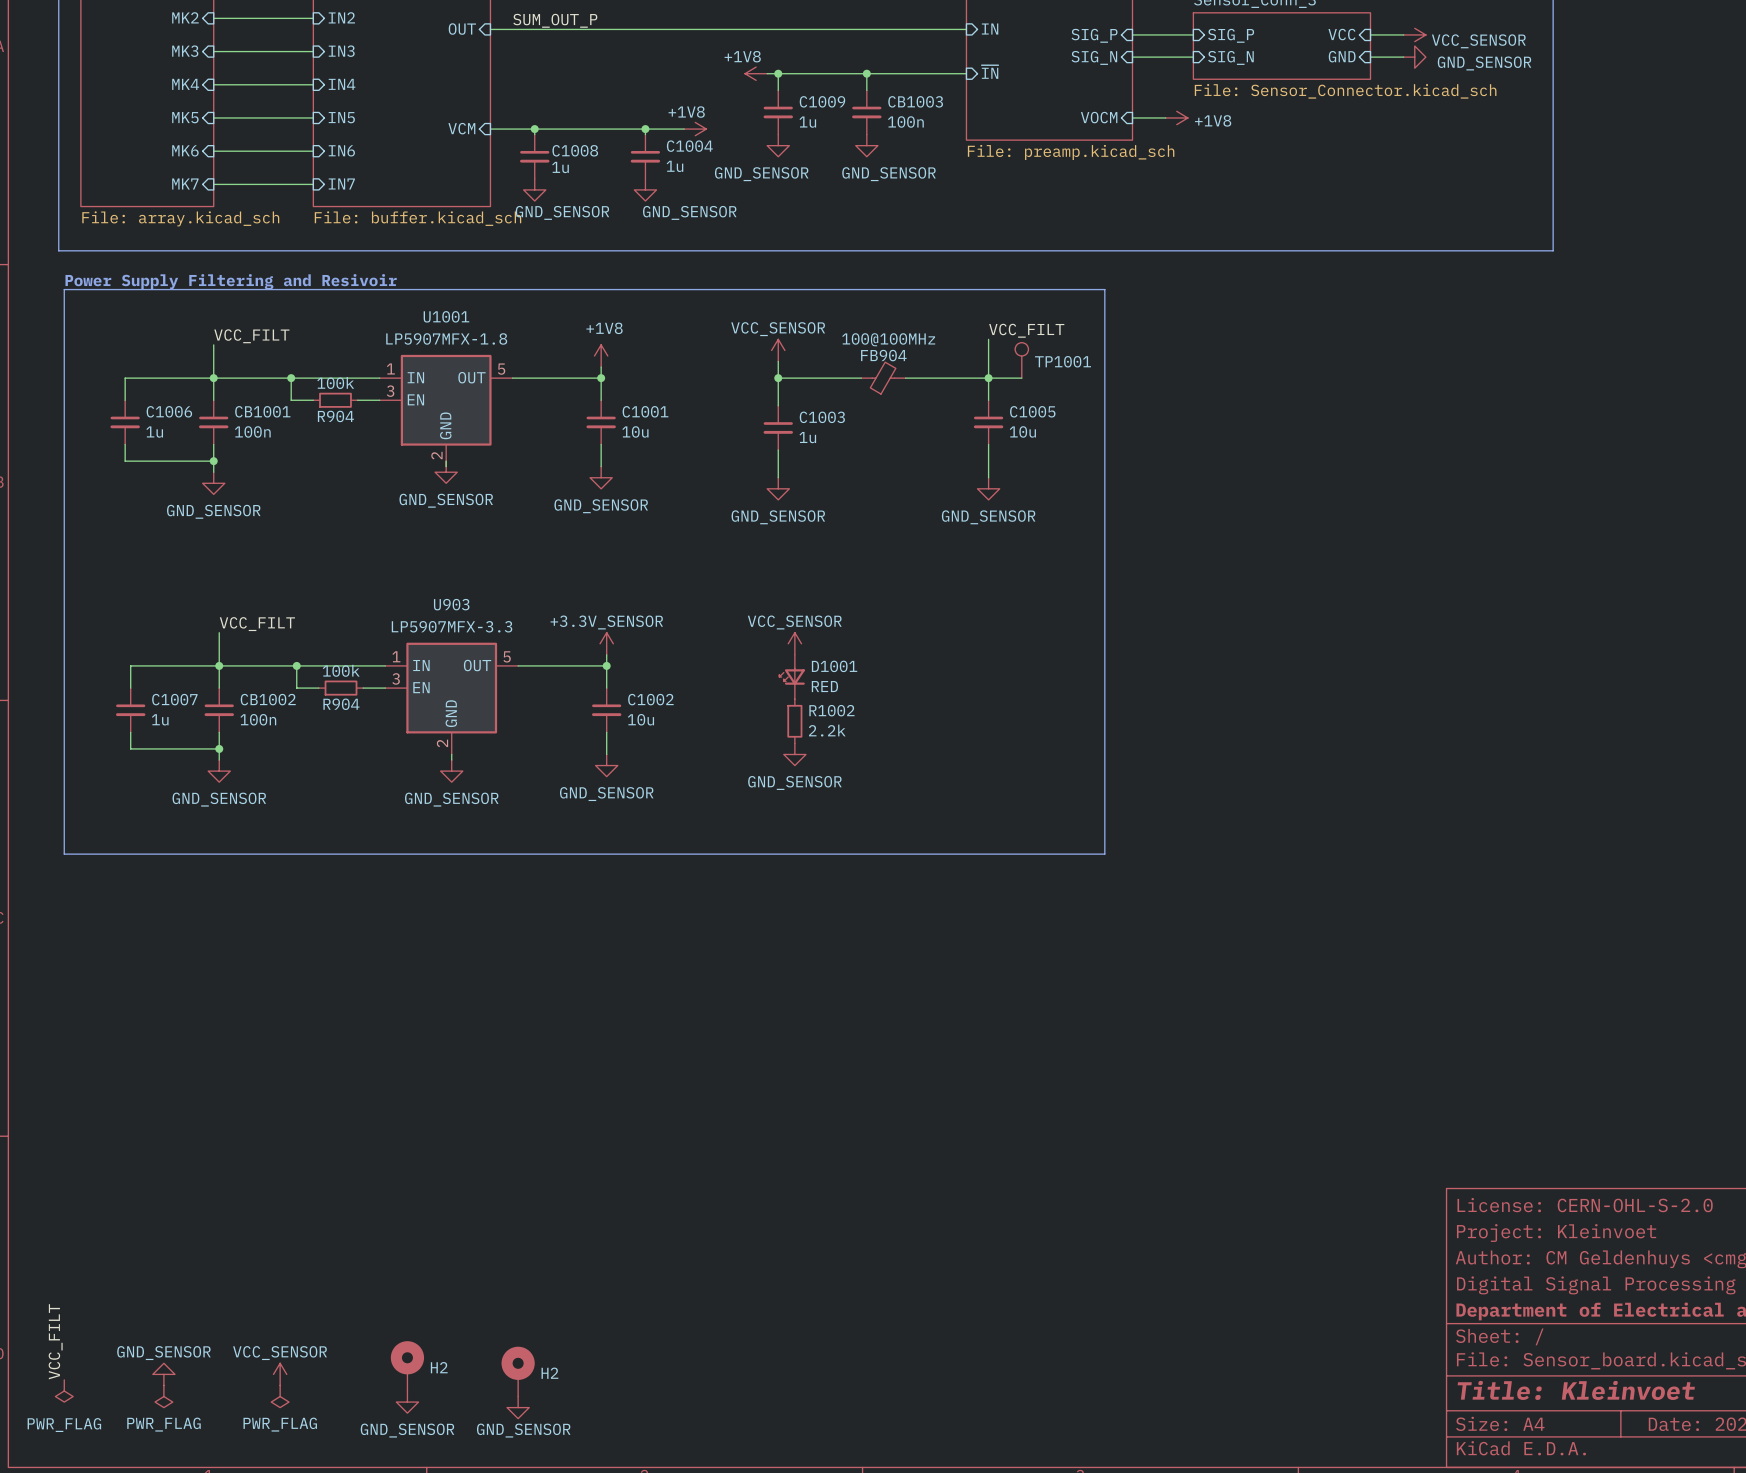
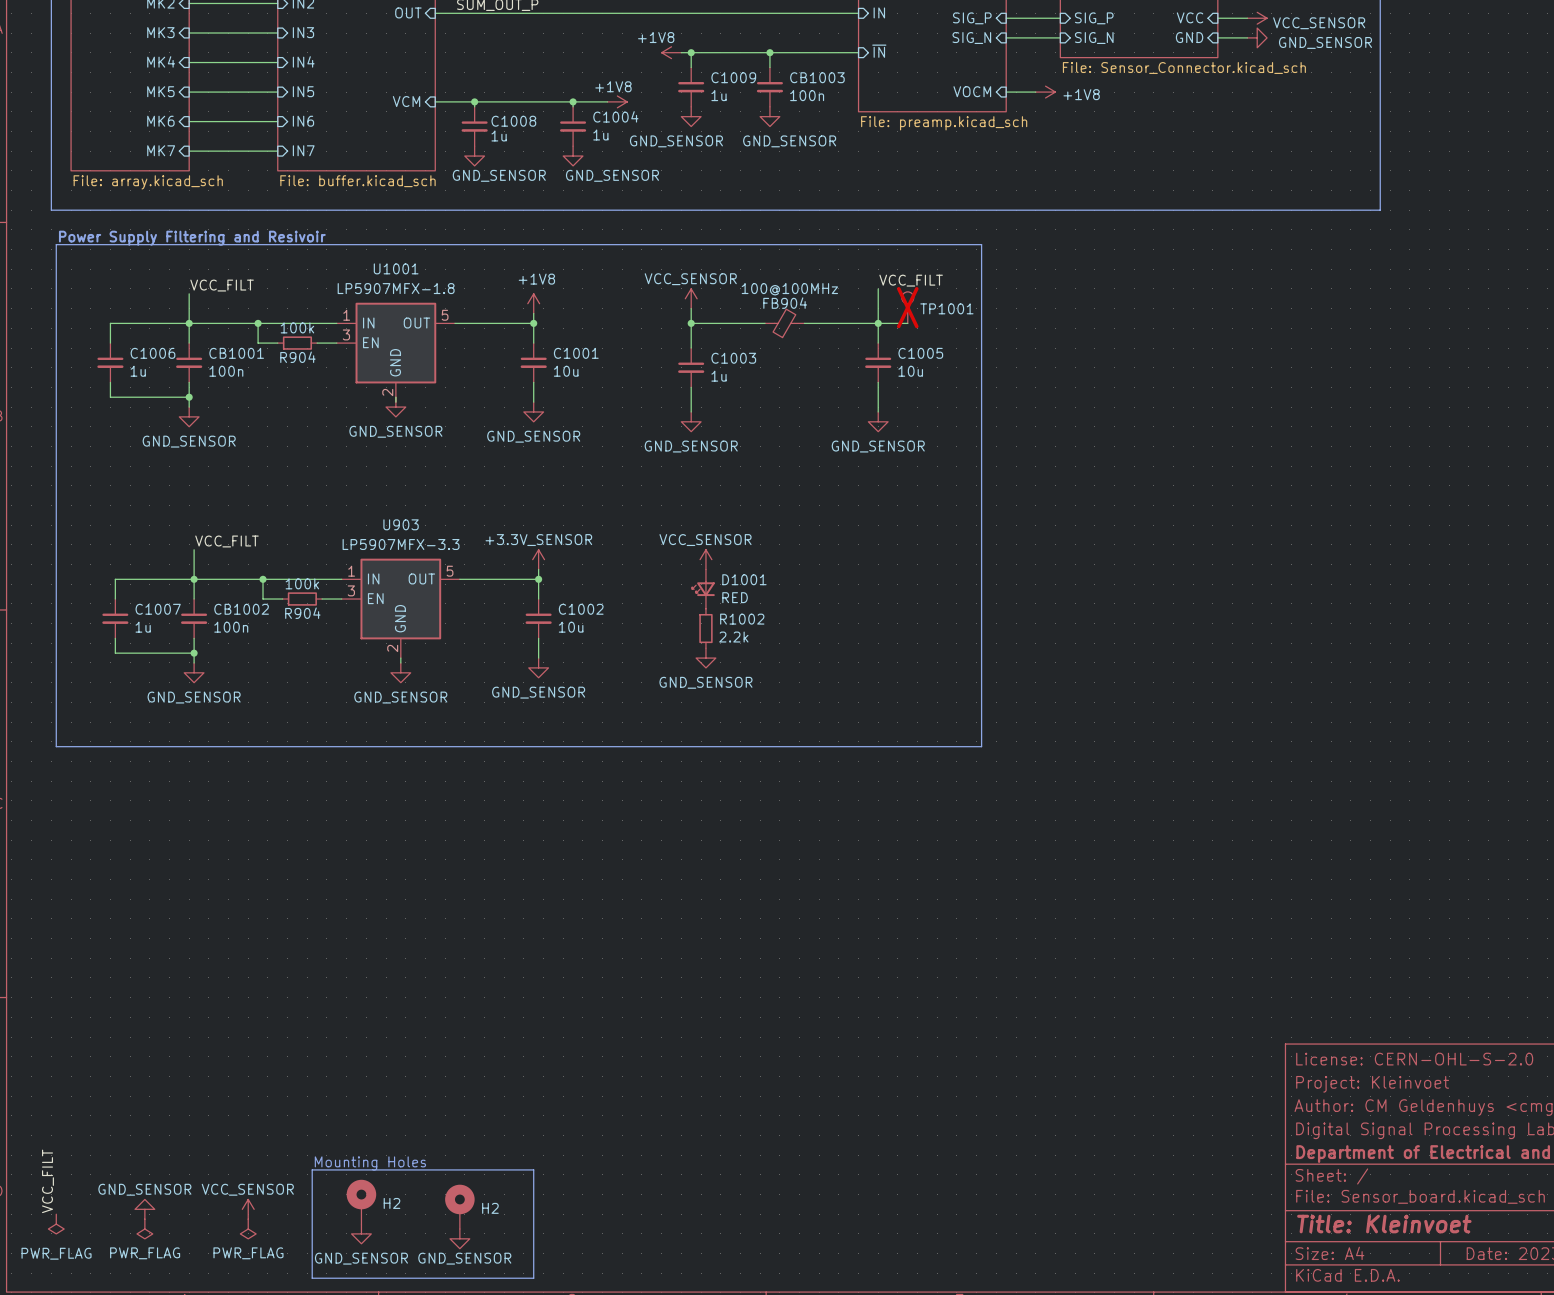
TP1001 do-not-place cross: none -> (907, 307)
text: none -> Mounting Holes (370, 1163)
line: none -> (312, 1169) (533, 1169) (533, 1278) (312, 1278) (312, 1169)

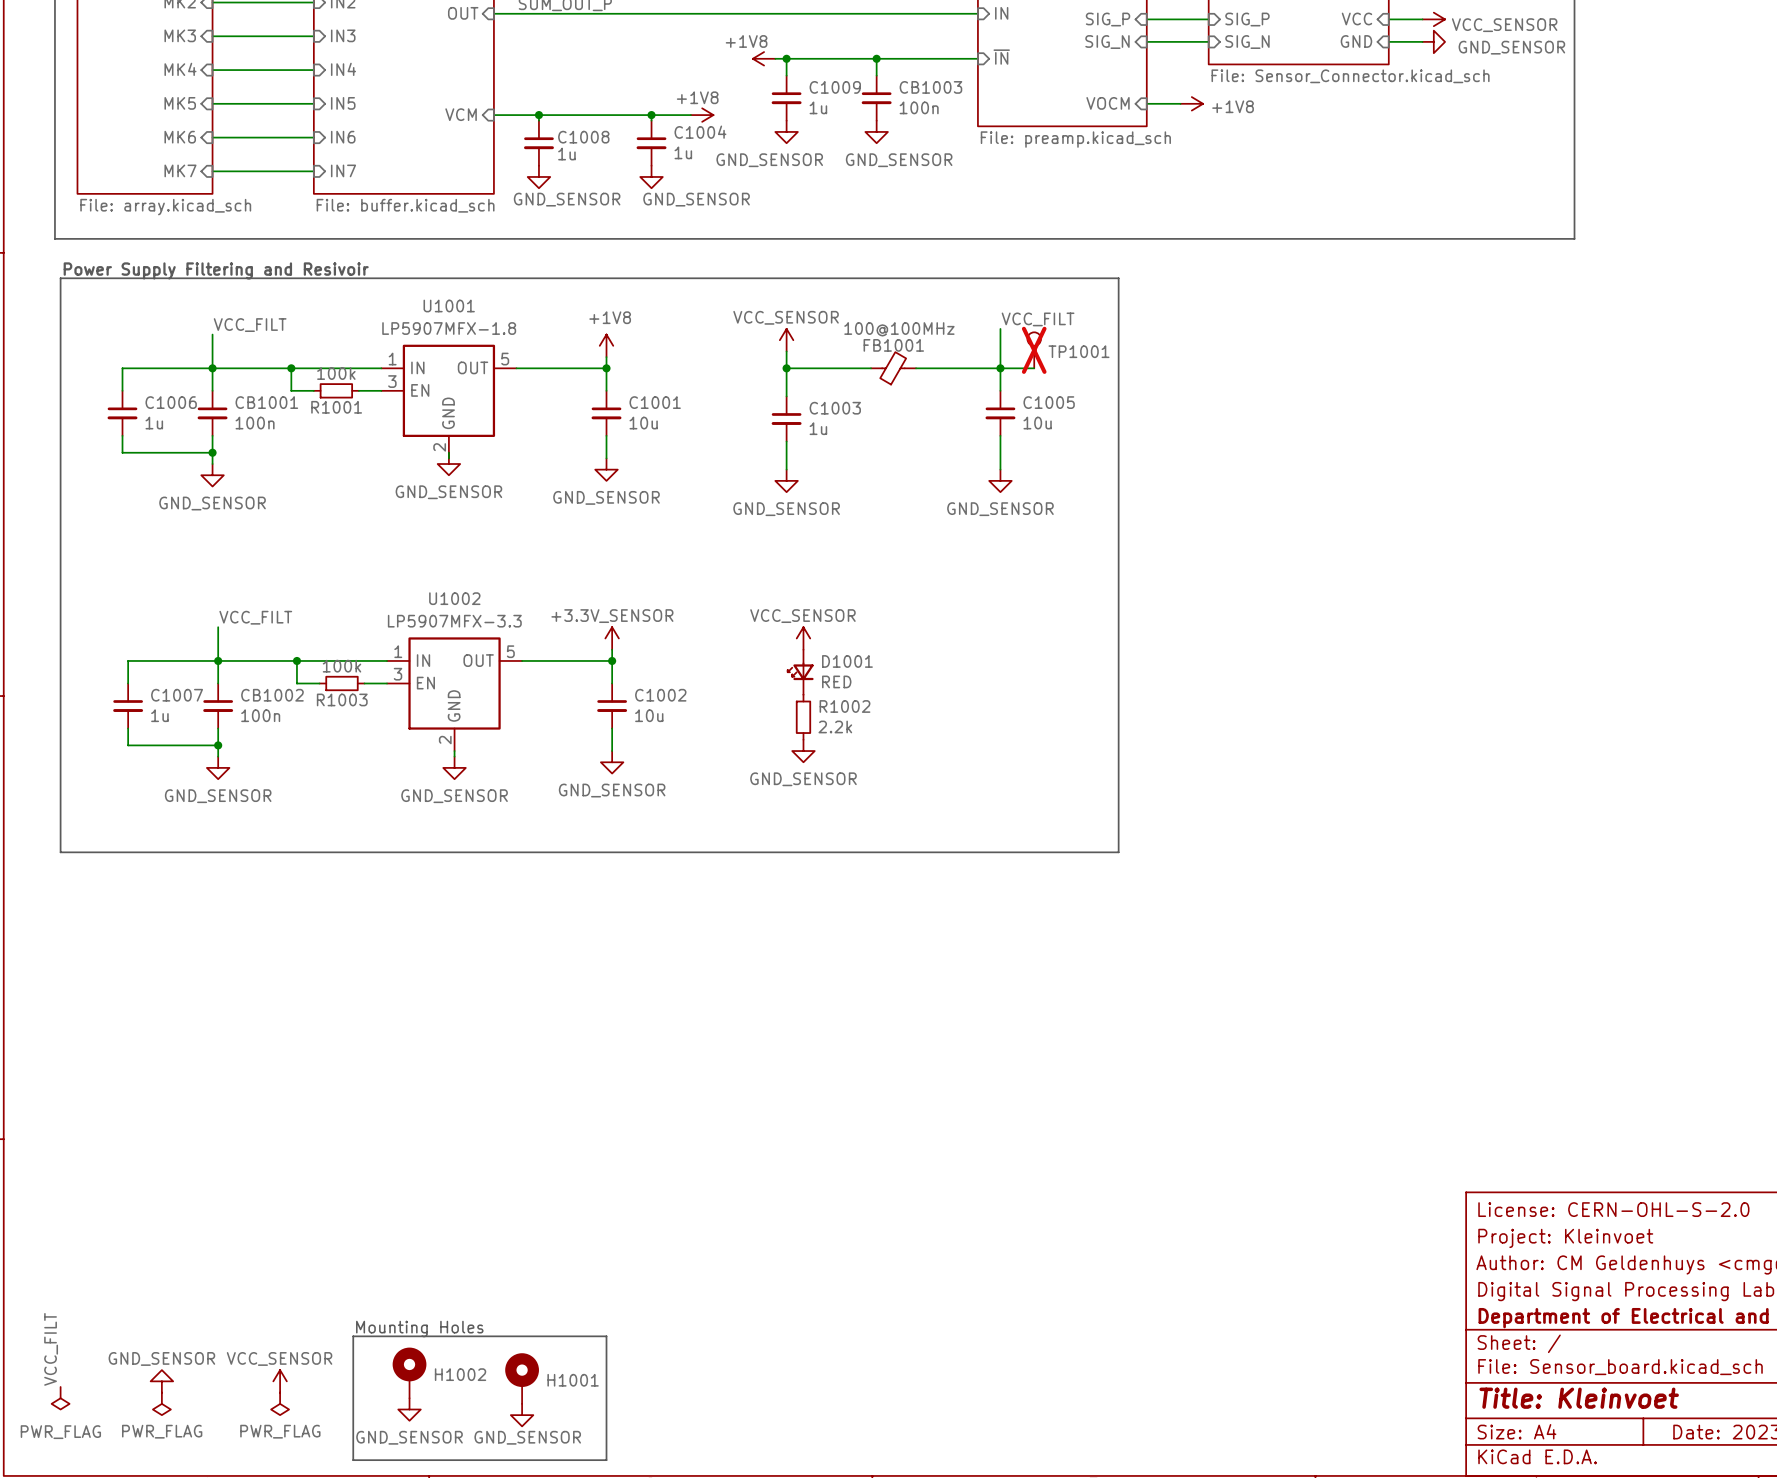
FB904 name: FB904 (785, 303) -> FB1001 (893, 345)
R904 name: R904 (297, 357) -> R1001 (336, 407)
U903 name: U903 (401, 524) -> U1002 (454, 598)
R904 name: R904 (302, 613) -> R1003 (342, 699)
H2 name: H2 (391, 1203) -> H1002 (460, 1374)
H2 name: H2 (490, 1208) -> H1001 (573, 1380)

